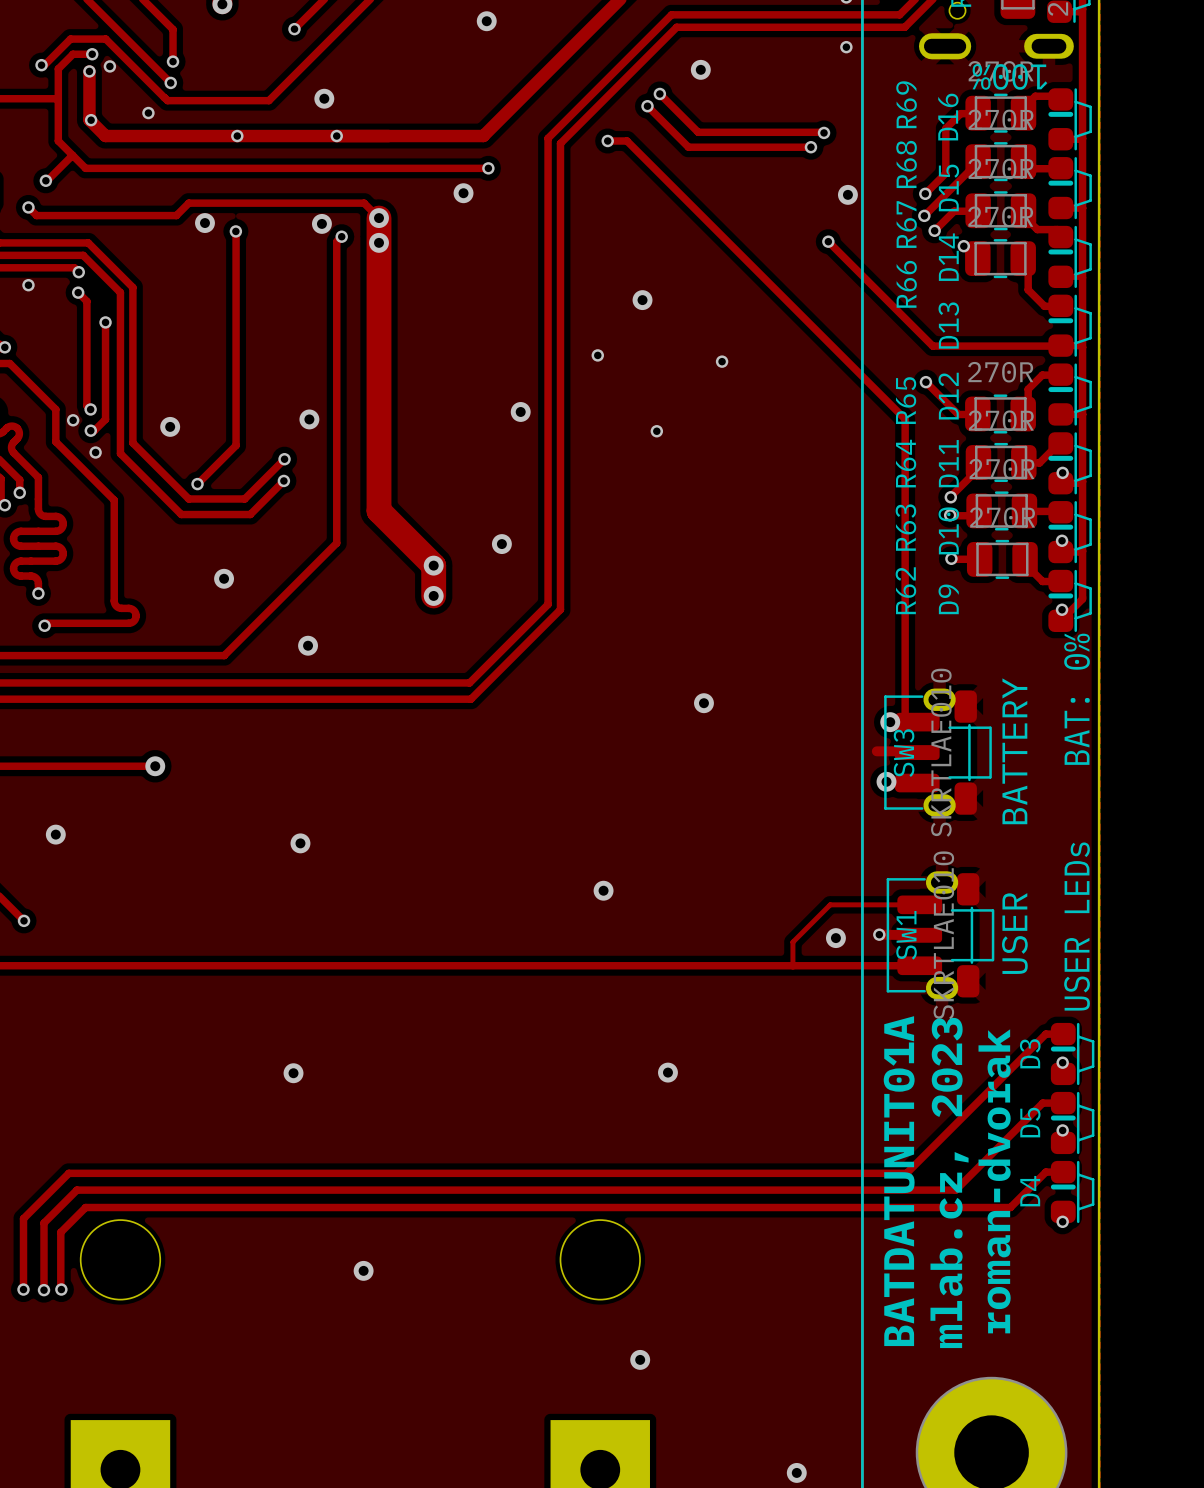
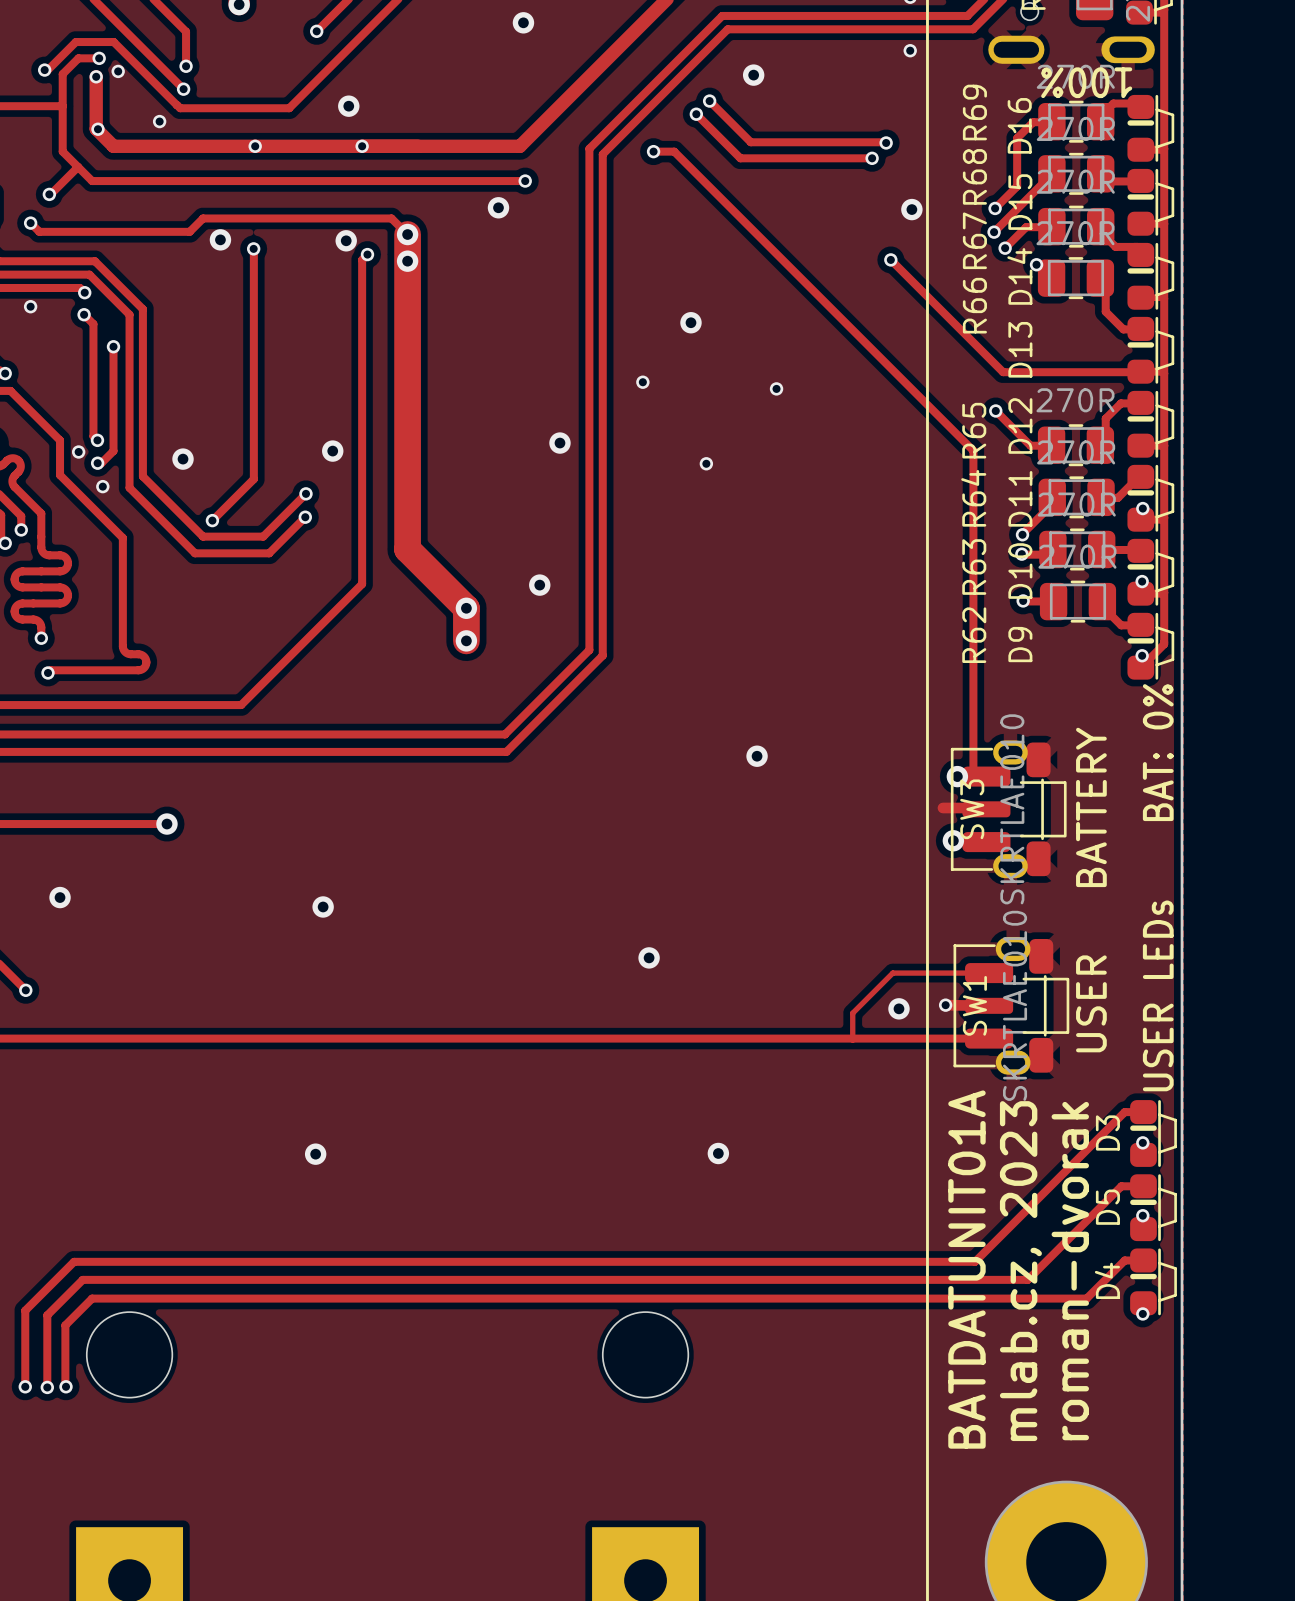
via: (224, 578) -> none
via: (308, 645) -> none
via: (363, 1270) -> none
via: (640, 1359) -> none
via: (796, 1472) -> none

